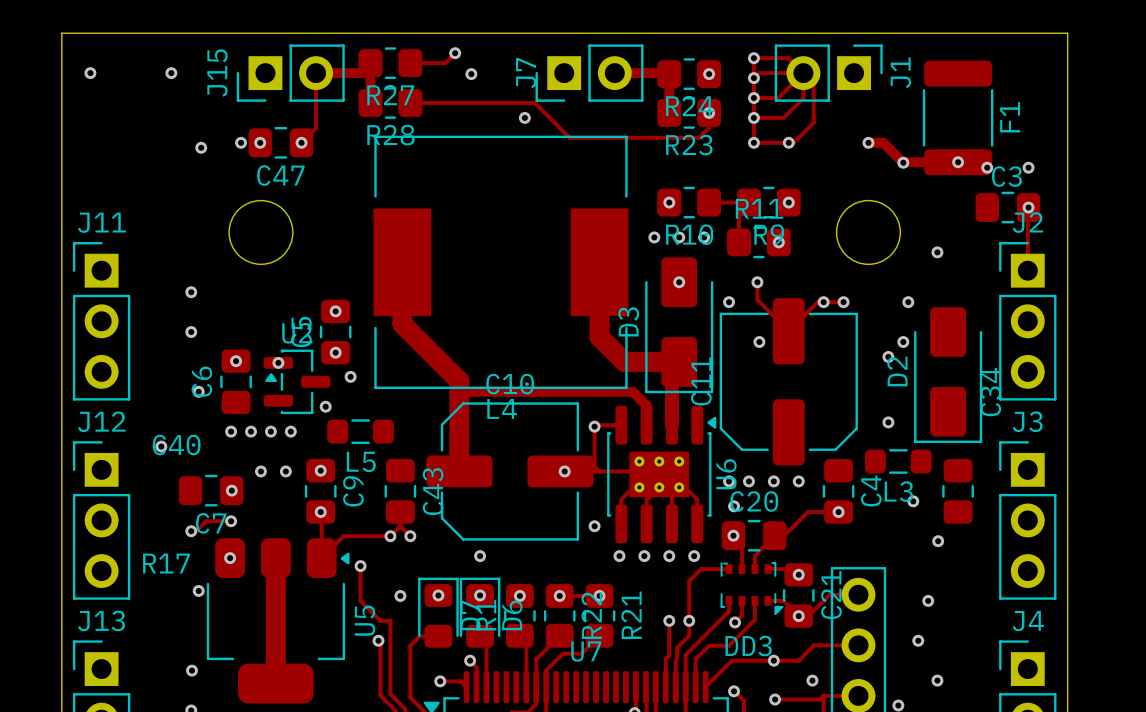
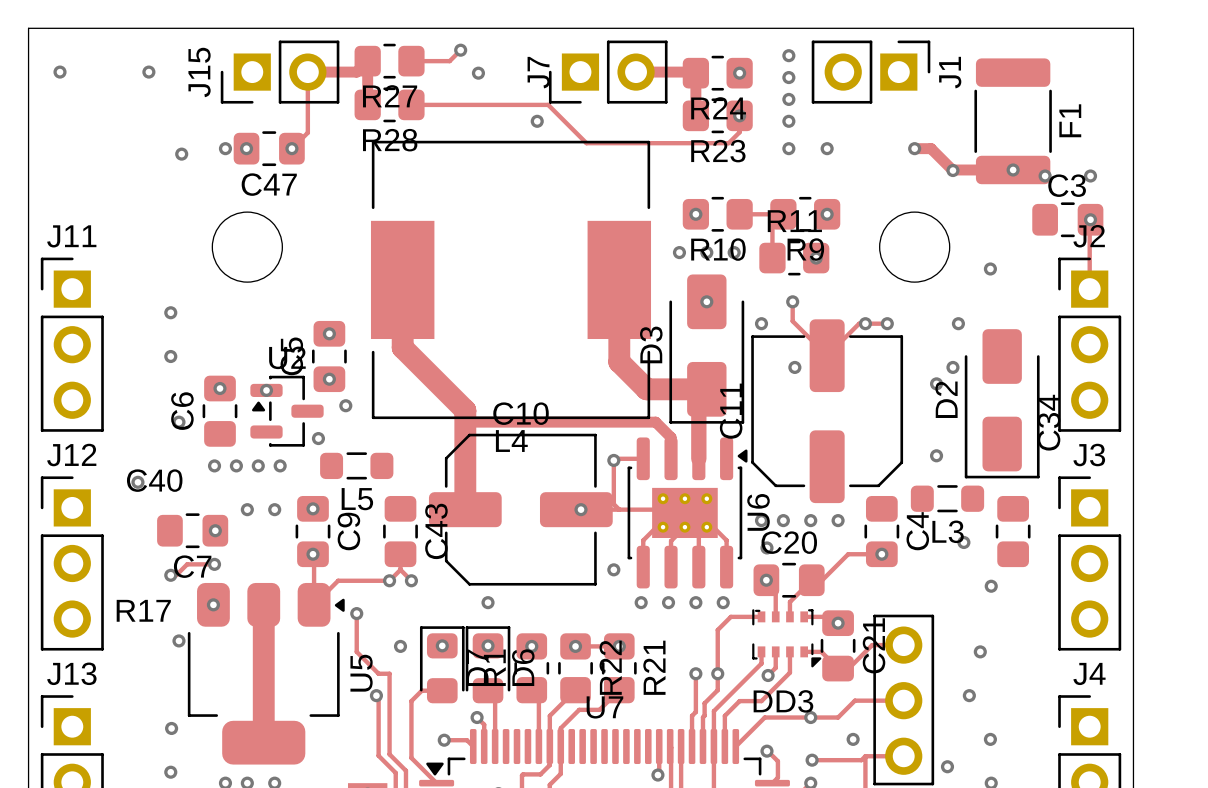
track: (753, 58) (753, 142) (793, 142) (813, 122) (813, 83) (788, 58) (753, 58) -> none
track: (803, 73) (803, 98) (783, 117) (753, 117) -> none
track: (803, 73) (758, 73) (753, 78) -> none
track: (803, 73) (778, 98) (753, 98) -> none
via: (798, 616) -> none

